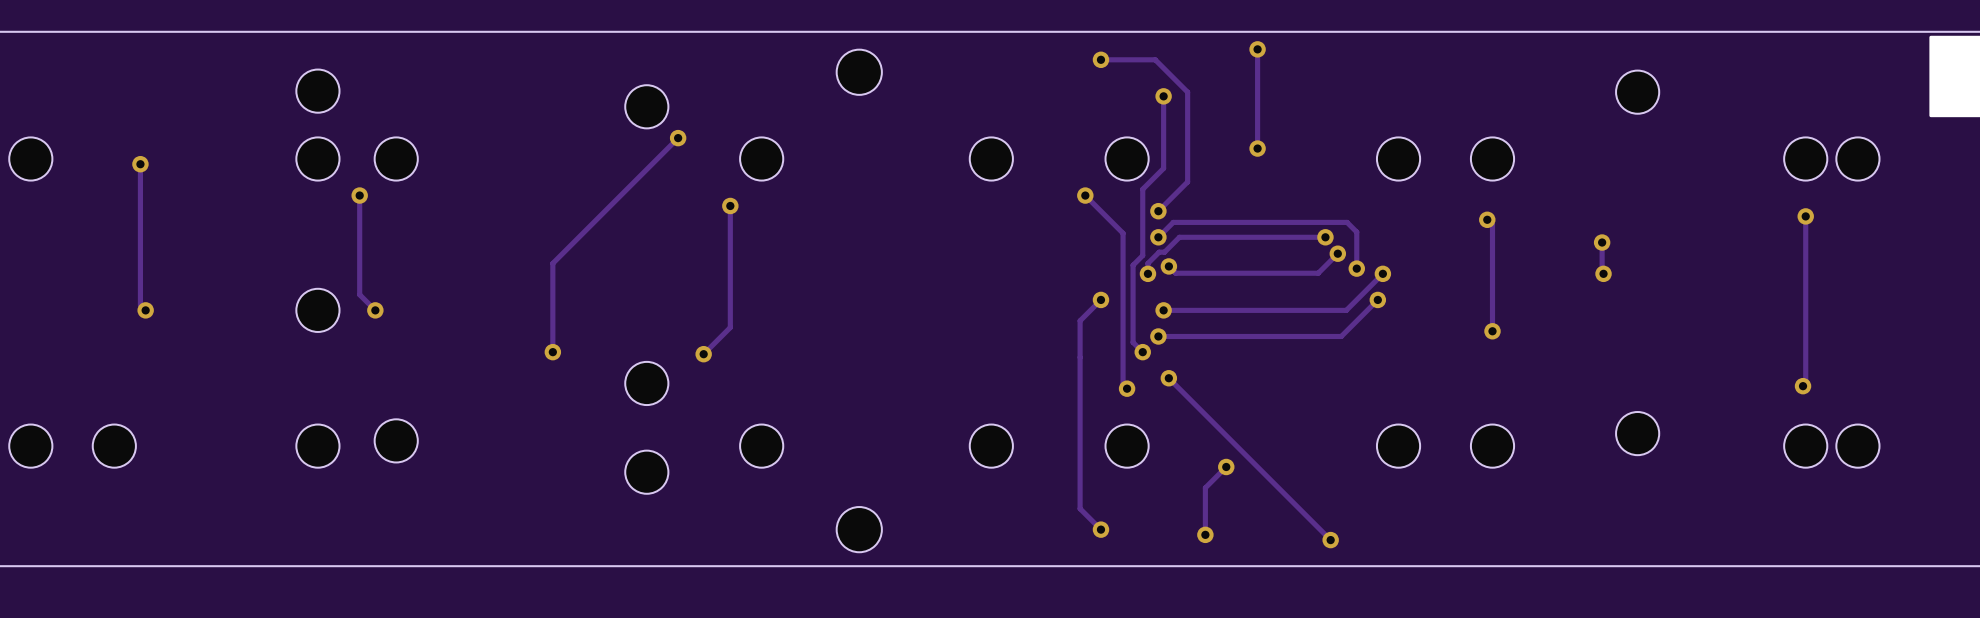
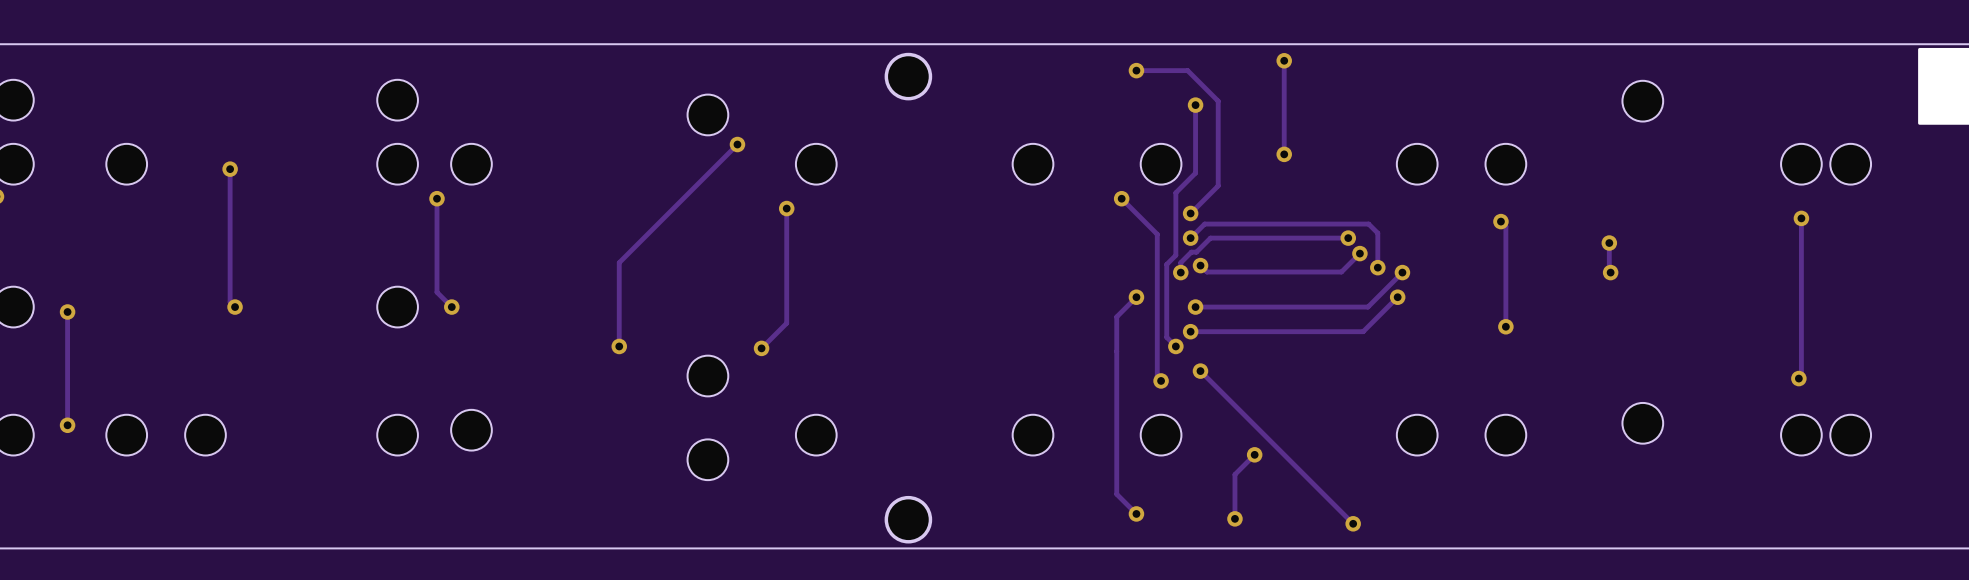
part footprint: [836, 49, 882, 95] -> [885, 53, 932, 100]
part footprint: [836, 507, 882, 553] -> [885, 496, 932, 543]

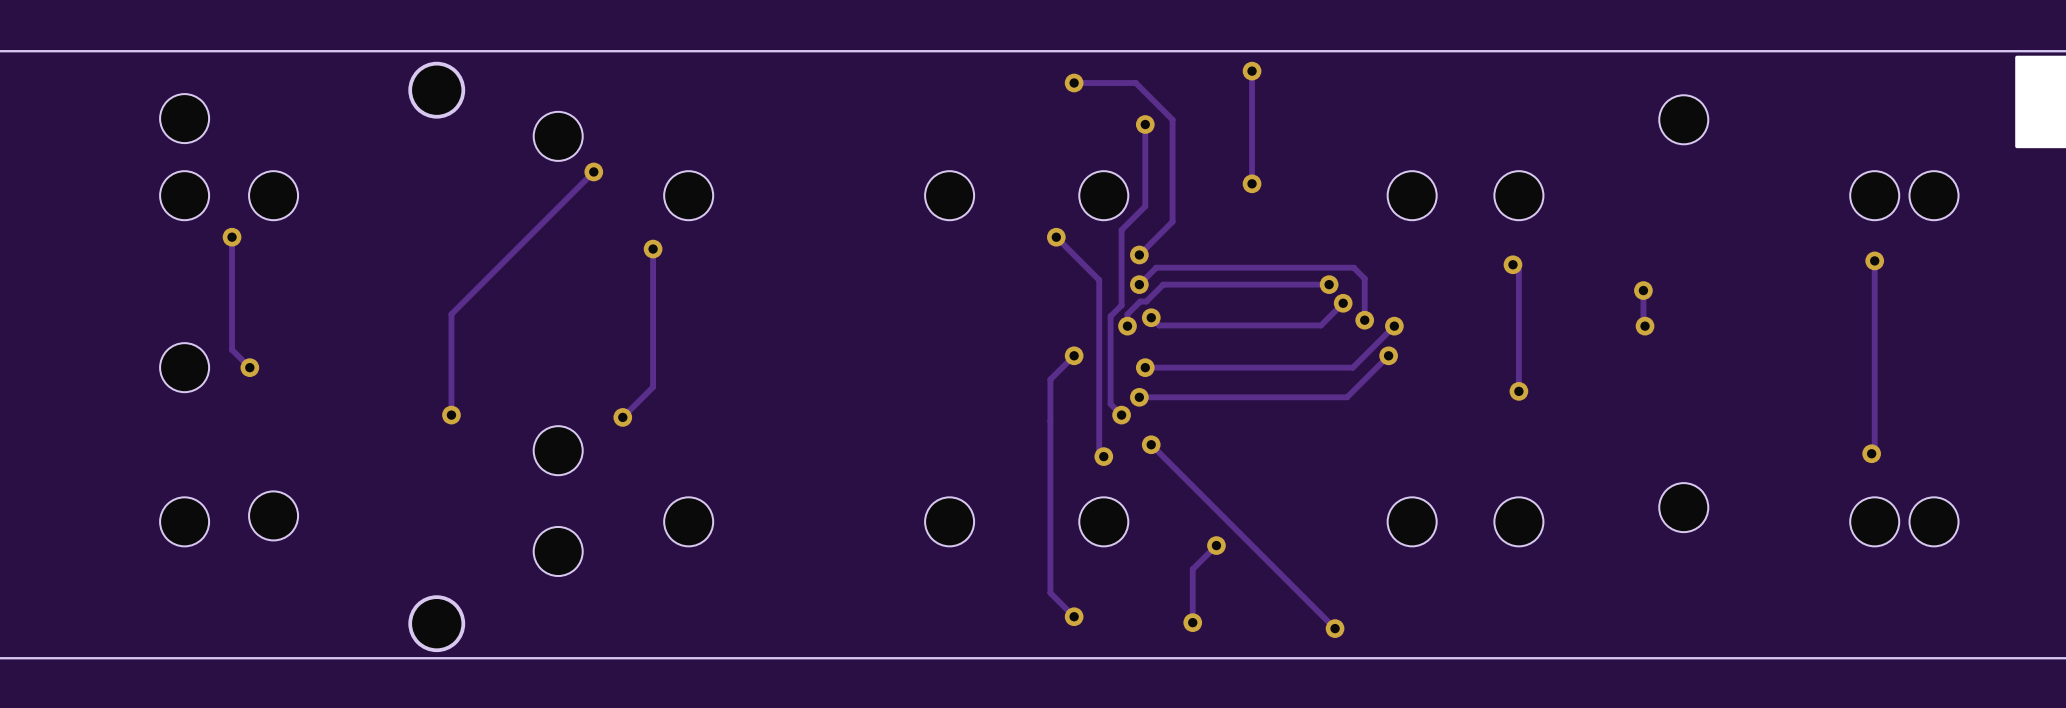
part: none -> (436, 90)
part: (908, 76) -> none
part: none -> (436, 623)
part: (908, 519) -> none

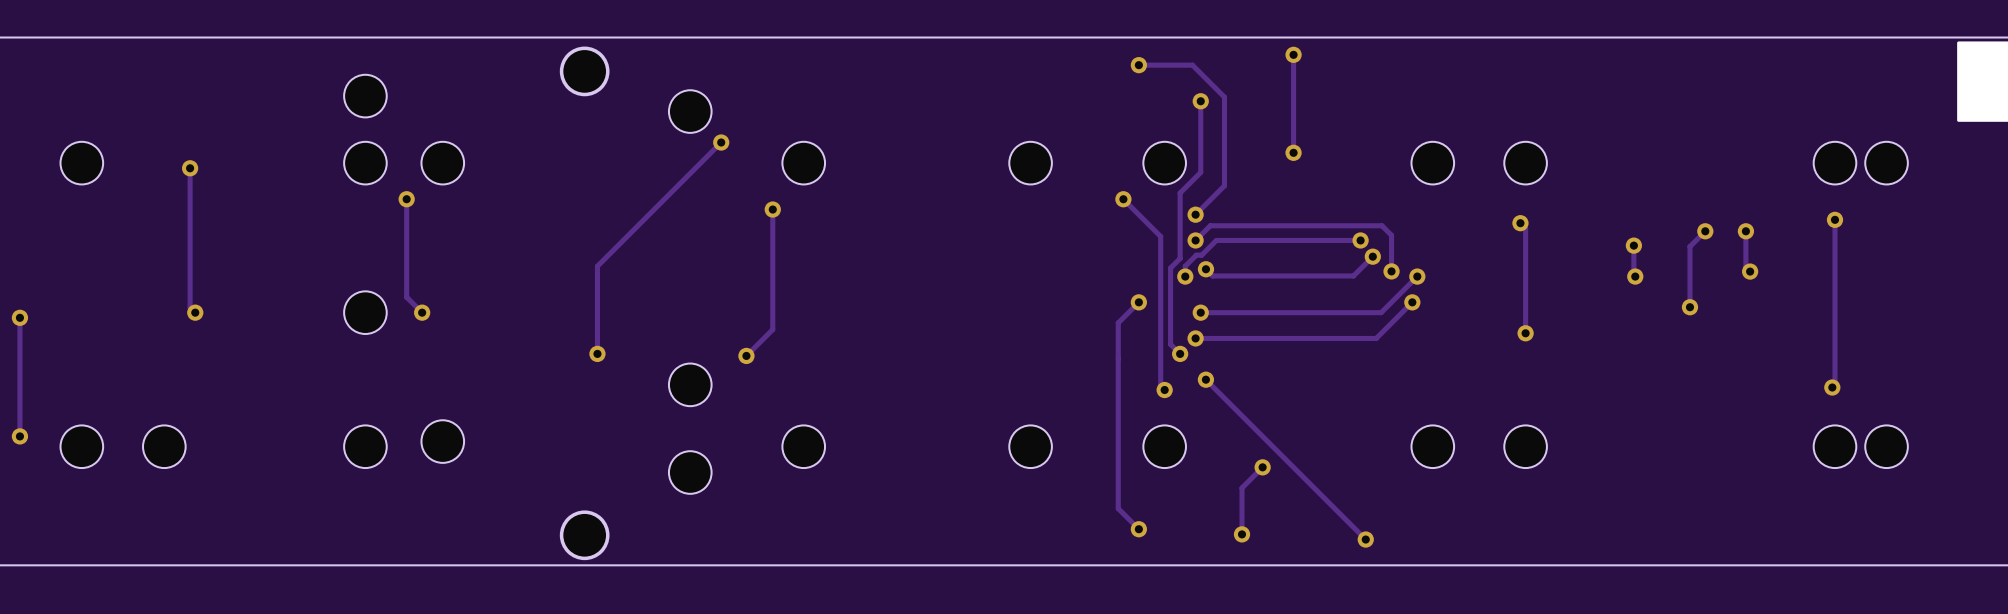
part: (1683, 119) -> none
track: none -> (1705, 231) (1689, 246) (1689, 307)
via: none -> (1705, 231)
track: none -> (1745, 231) (1745, 267) (1750, 271)
via: none -> (1745, 231)
via: none -> (1750, 271)
via: none -> (1689, 307)
part: (1683, 507) -> none

